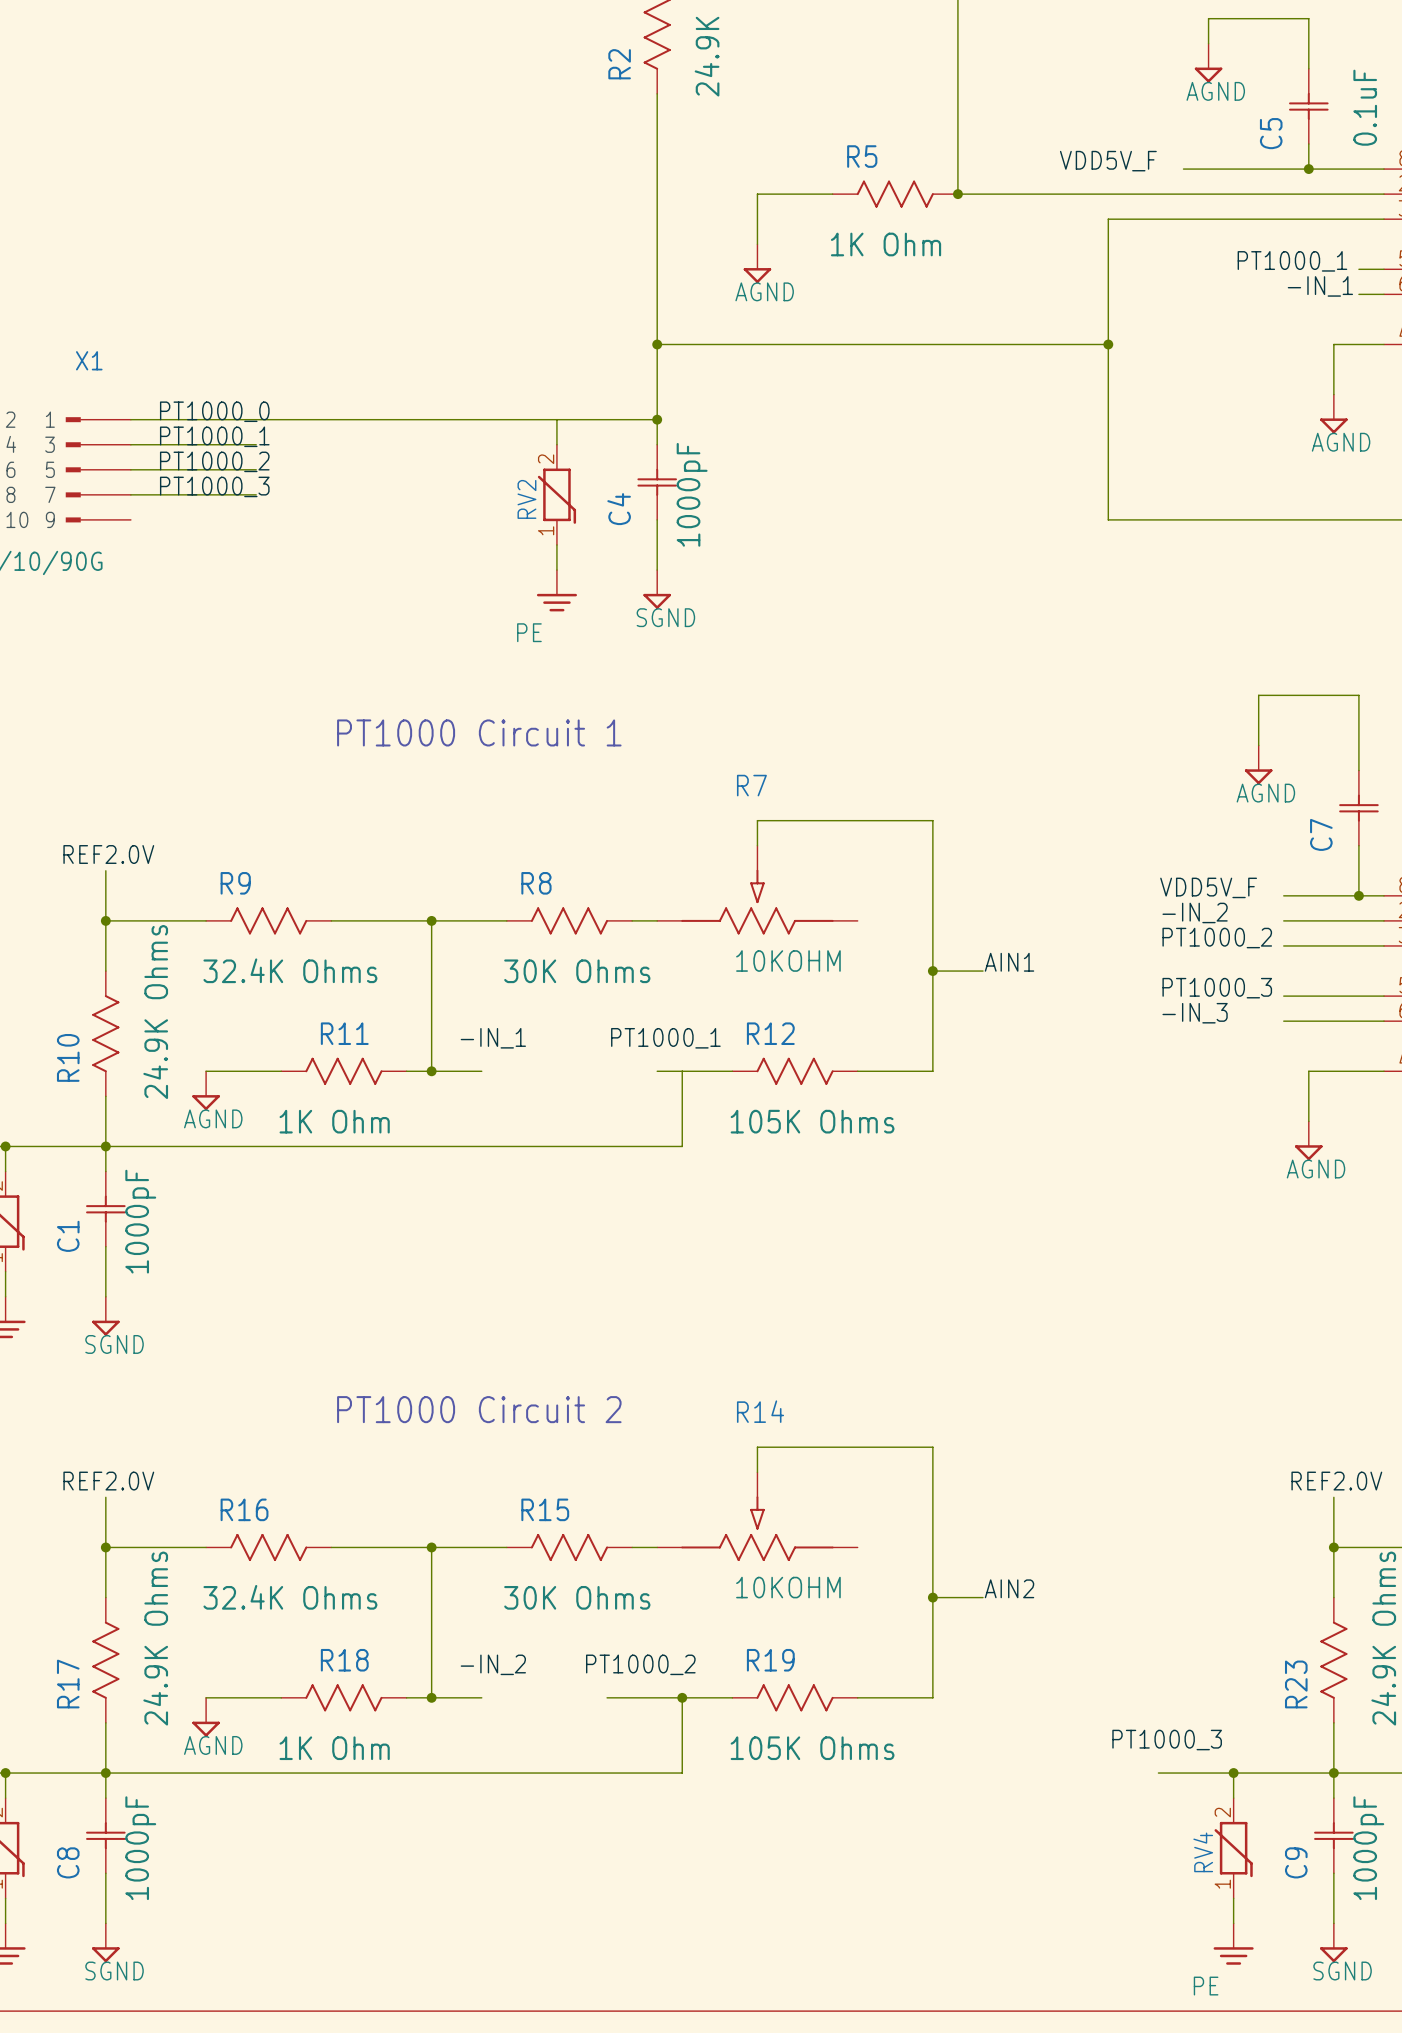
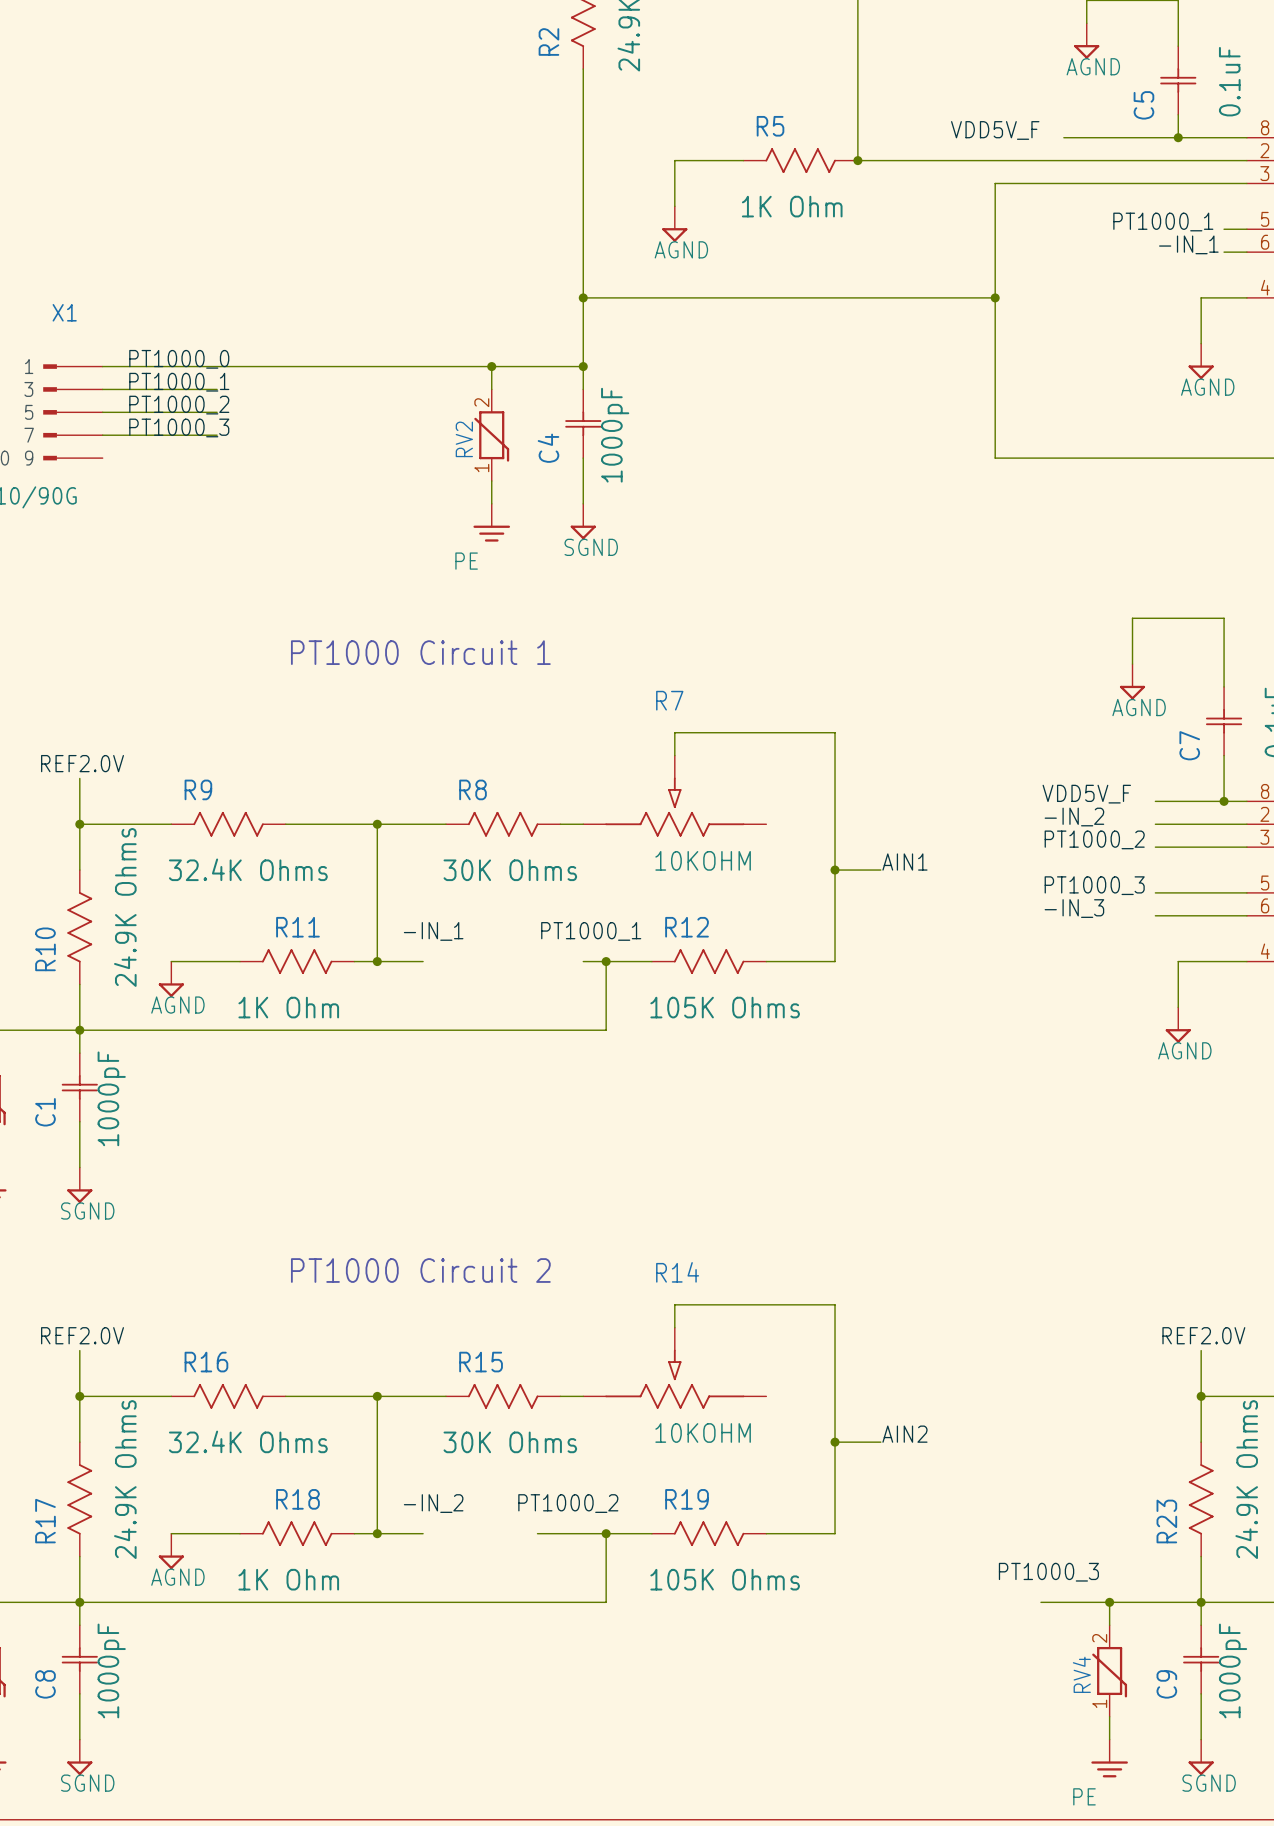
junction: none -> (491, 366)
junction: none -> (606, 961)

